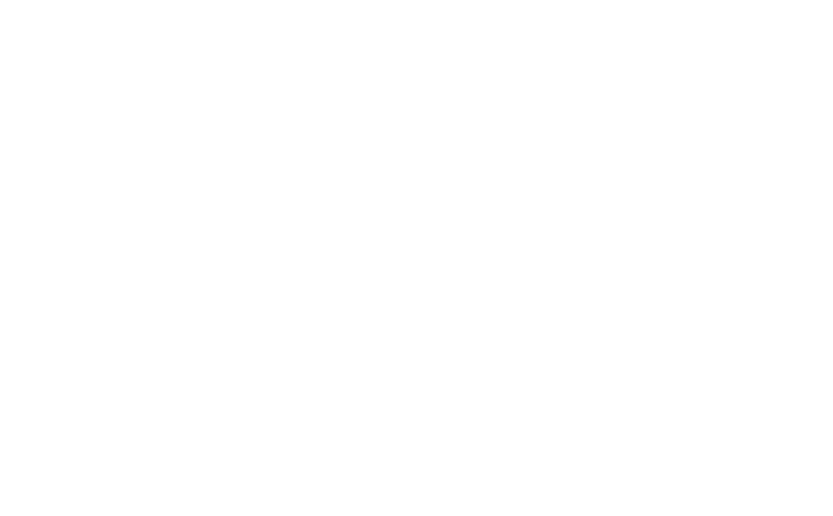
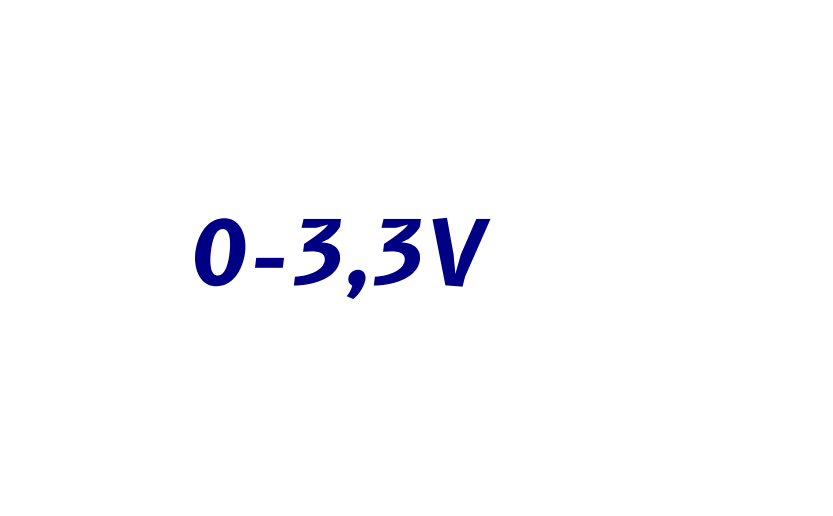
text: none -> 0-3,3V (342, 258)

